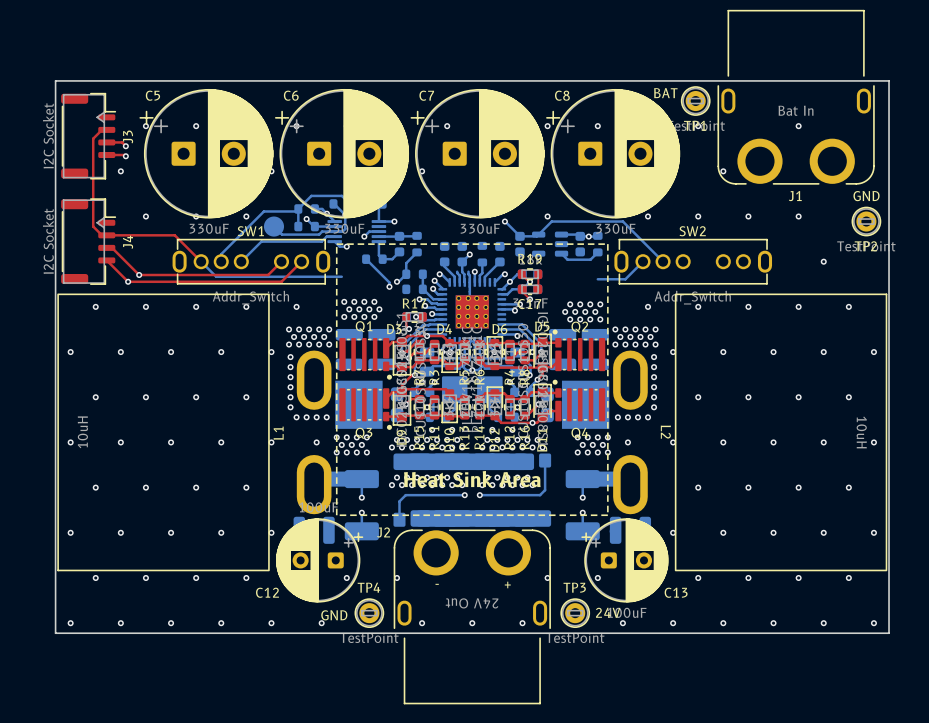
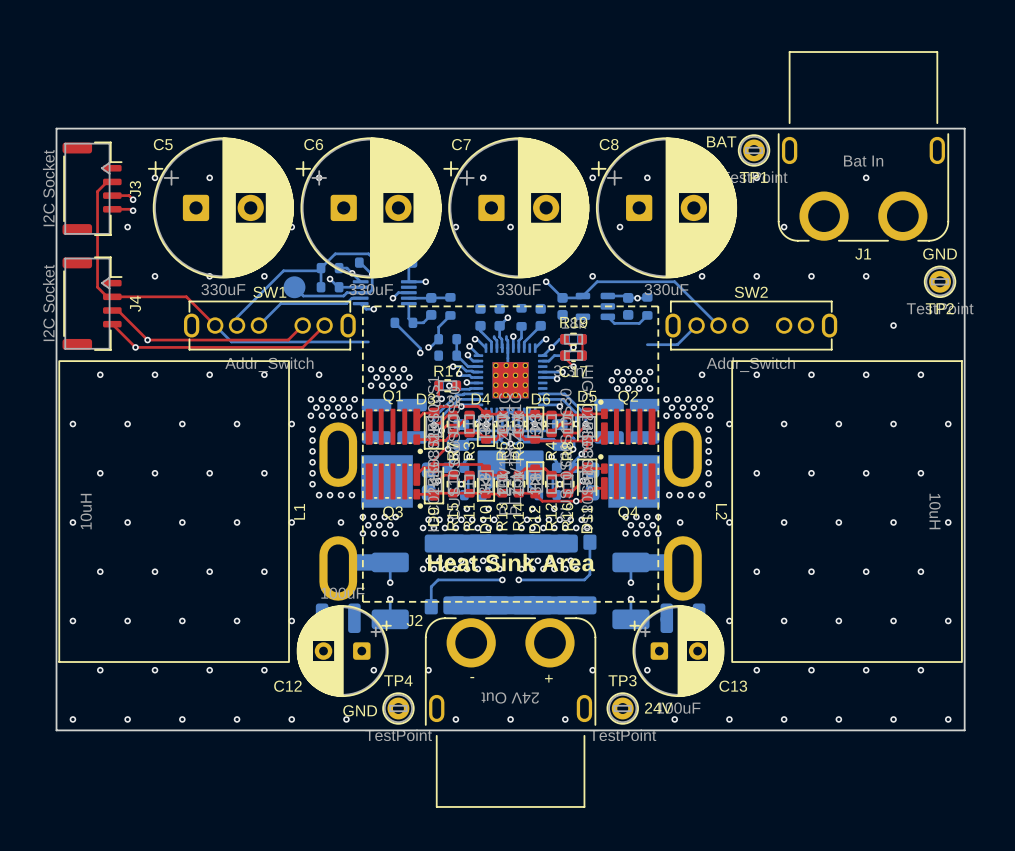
via: none -> (510, 227)
via: none -> (620, 227)

